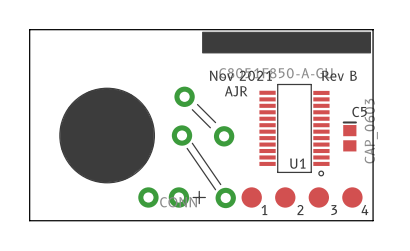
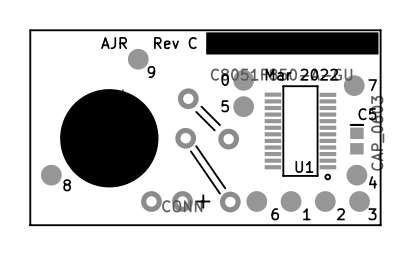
text: none -> Rev C (175, 43)
part: none -> (138, 59)
text: none -> 9 (151, 72)
text: none -> Mar 2022 (301, 74)
text: Nov 2021 (240, 75) -> none
text: Rev B (339, 75) -> none
text: none -> 0 (225, 79)
part: none -> (243, 80)
part: none -> (354, 85)
text: none -> 7 (372, 85)
text position: AJR (236, 91) -> AJR (114, 43)
text: none -> 5 (225, 106)
part: none -> (243, 106)
part: none -> (51, 175)
part: none -> (356, 175)
text: none -> 4 (372, 182)
text: none -> 8 (67, 185)
text: 1 (264, 210) -> 6 (275, 214)
text: 2 (300, 210) -> 1 (306, 214)
text: 3 (334, 210) -> 2 (340, 214)
text: 4 (364, 210) -> 3 (372, 214)

